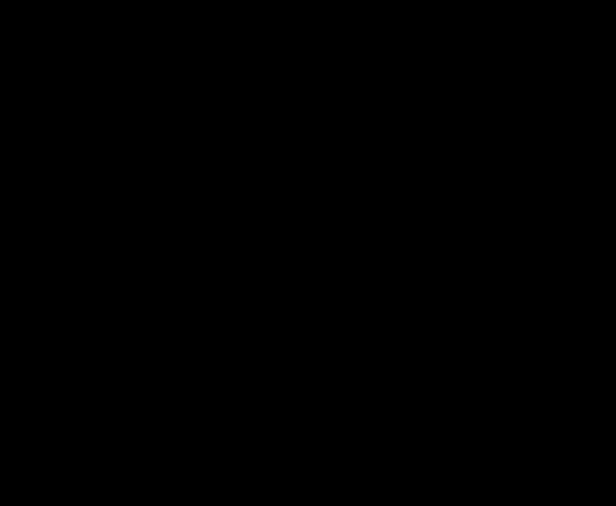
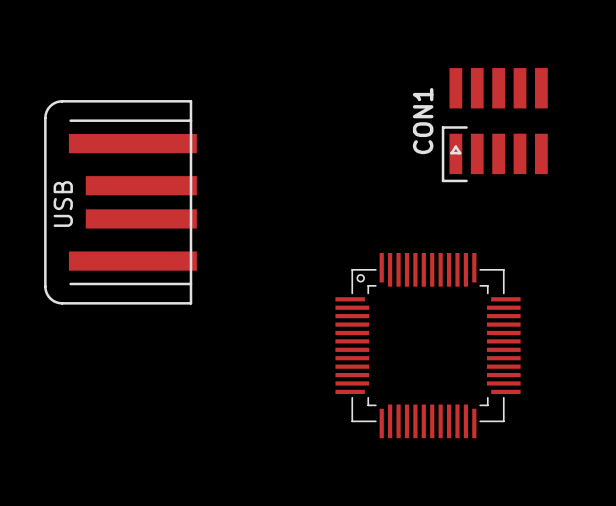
CON1: none -> (494, 125)
part: none -> USB (120, 202)
part: none -> (428, 345)

